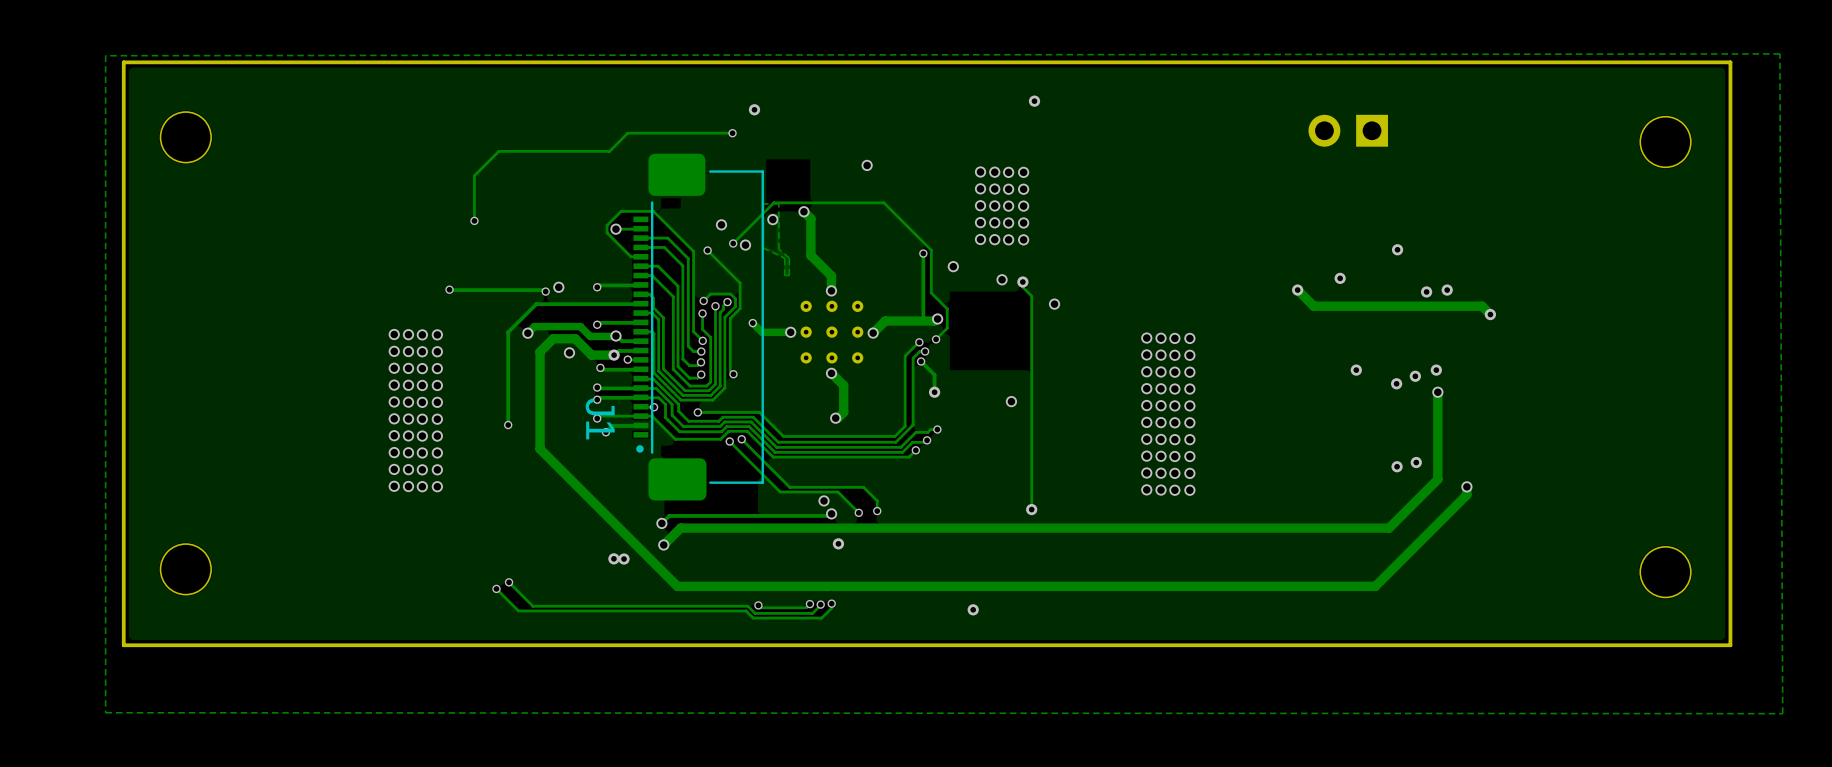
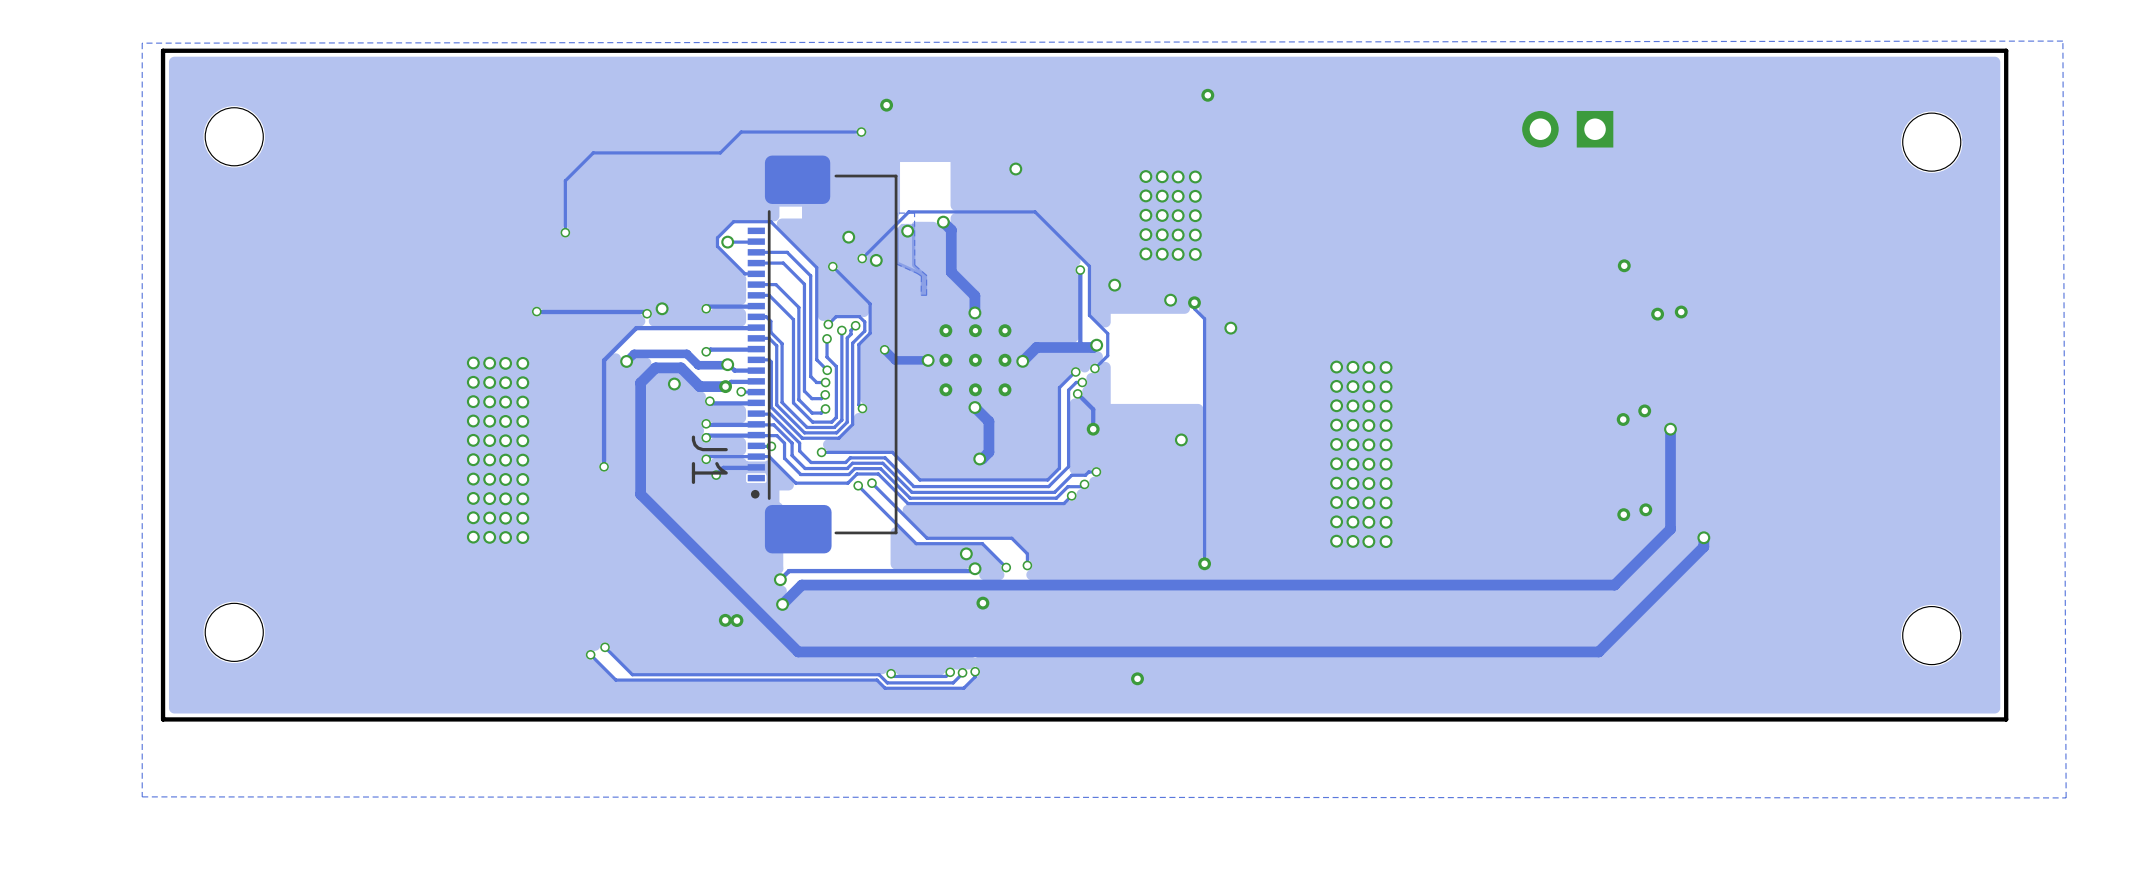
via: (1340, 278) -> none
track: (1297, 290) (1313, 306) (1482, 306) (1490, 314) -> none
via: (1297, 290) -> none
via: (1490, 314) -> none
via: (1356, 370) -> none
via: (1436, 370) -> none

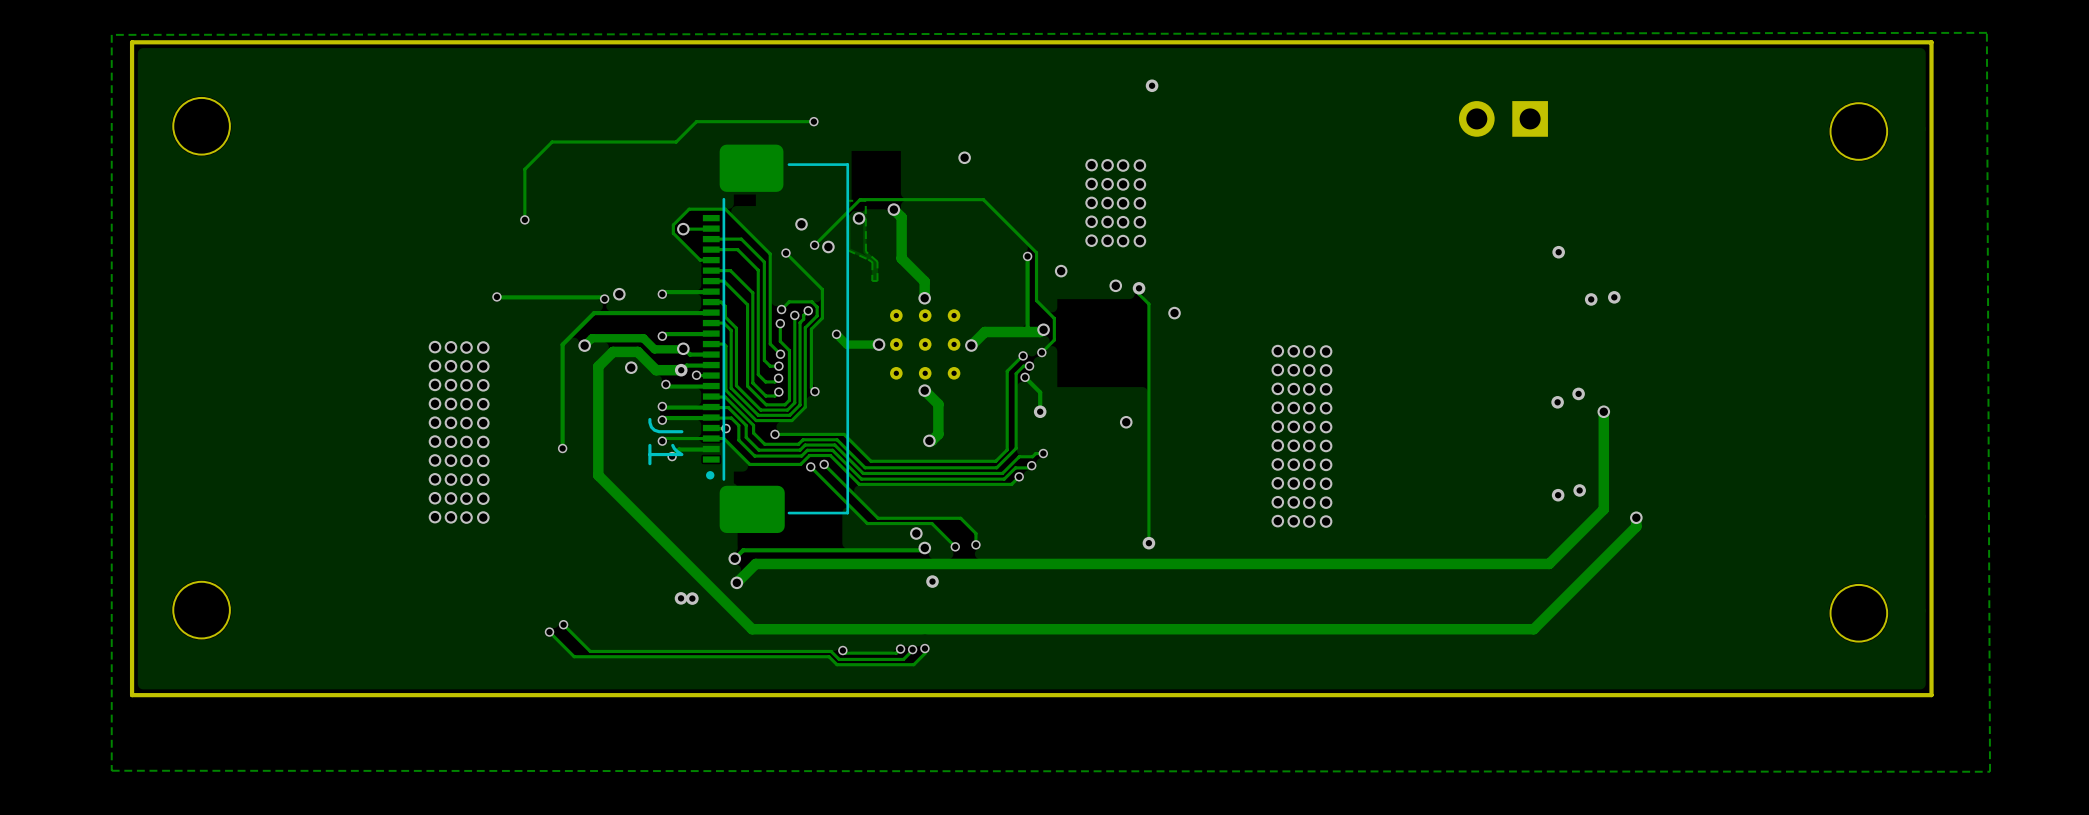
via: (886, 105) -> none
via: (1137, 678) -> none

